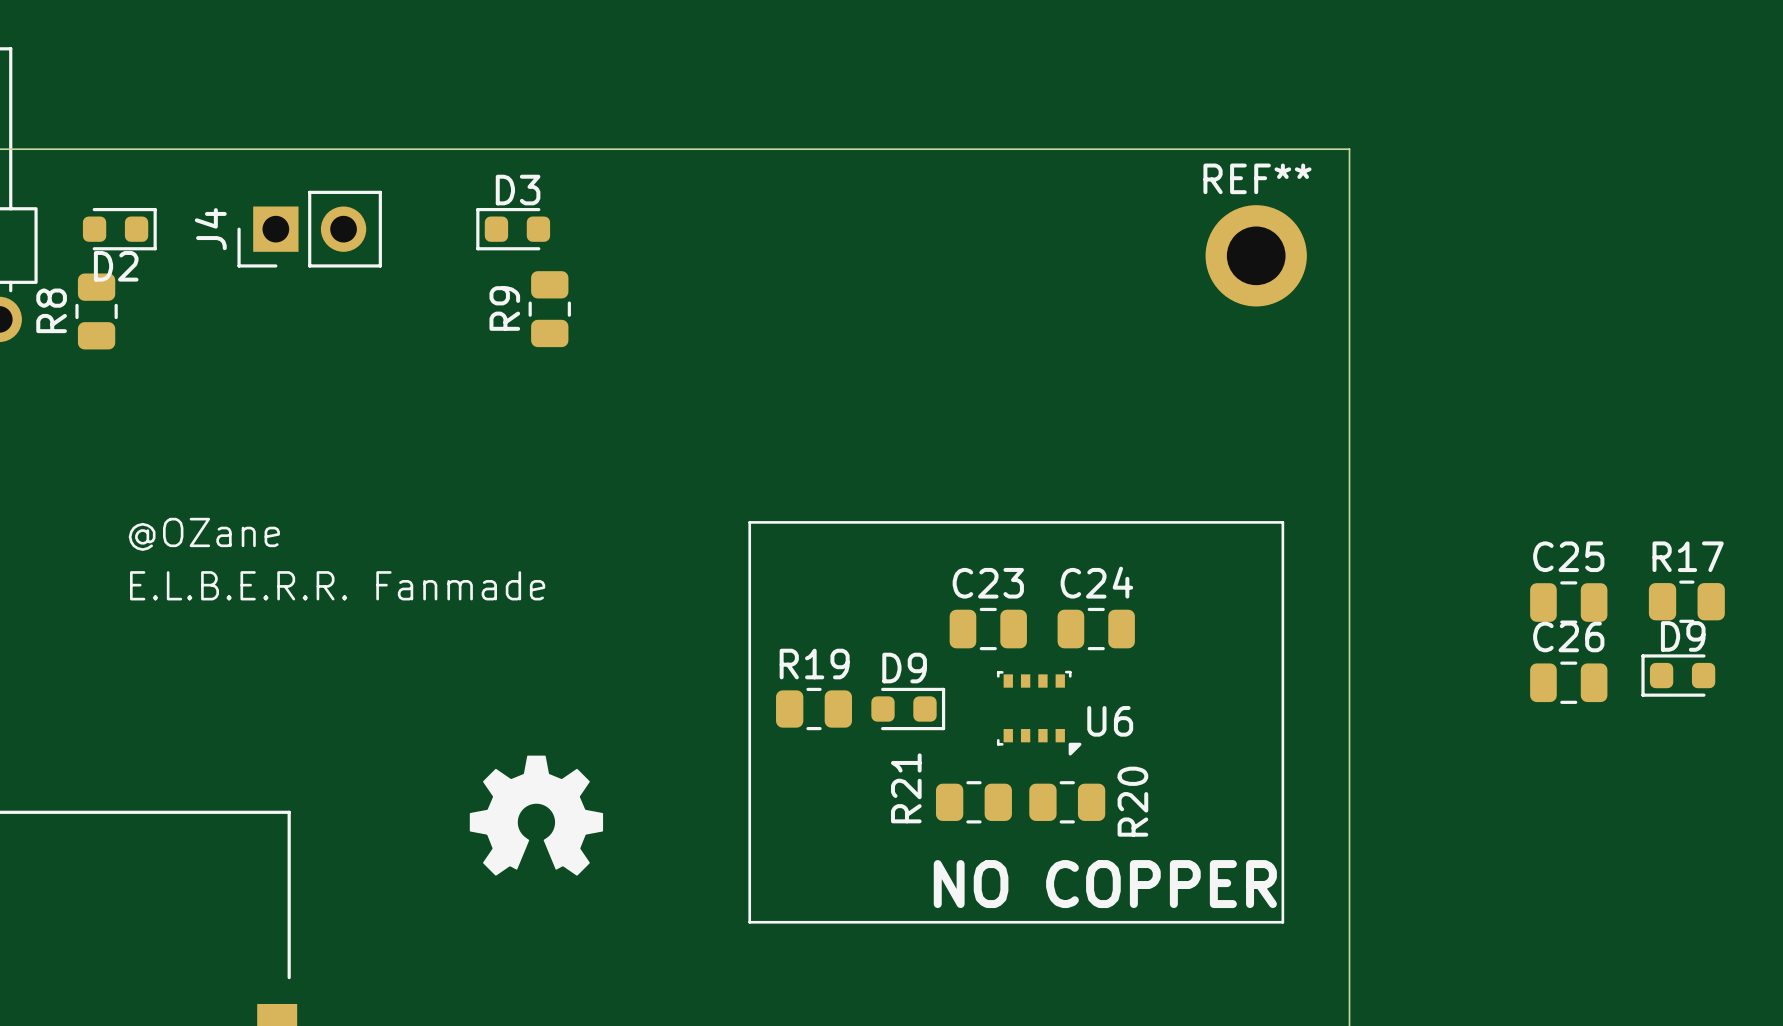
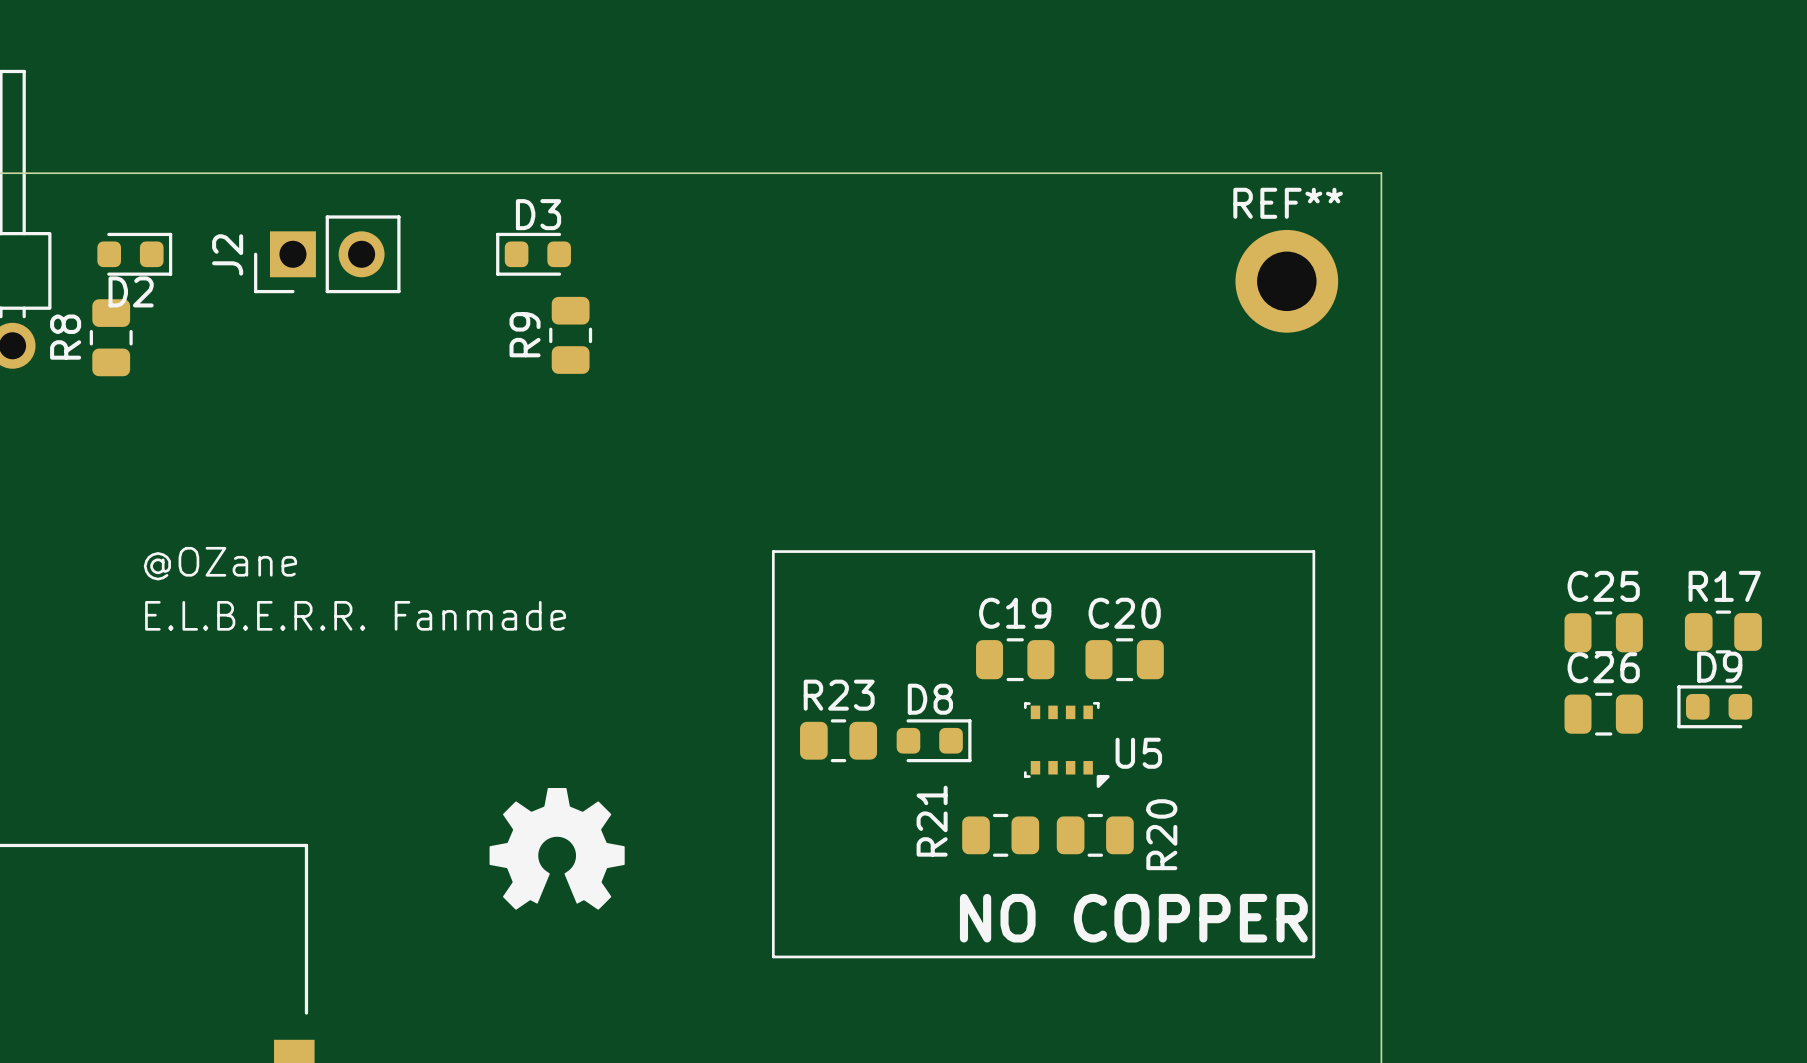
J4 name: J4 (210, 229) -> J2 (227, 254)
C24 name: C24 (1096, 582) -> C20 (1124, 613)
C23 name: C23 (988, 583) -> C19 (1015, 613)
R19 name: R19 (814, 664) -> R23 (839, 695)
D9 name: D9 (904, 668) -> D8 (930, 699)
U6 name: U6 (1110, 721) -> U5 (1138, 753)

